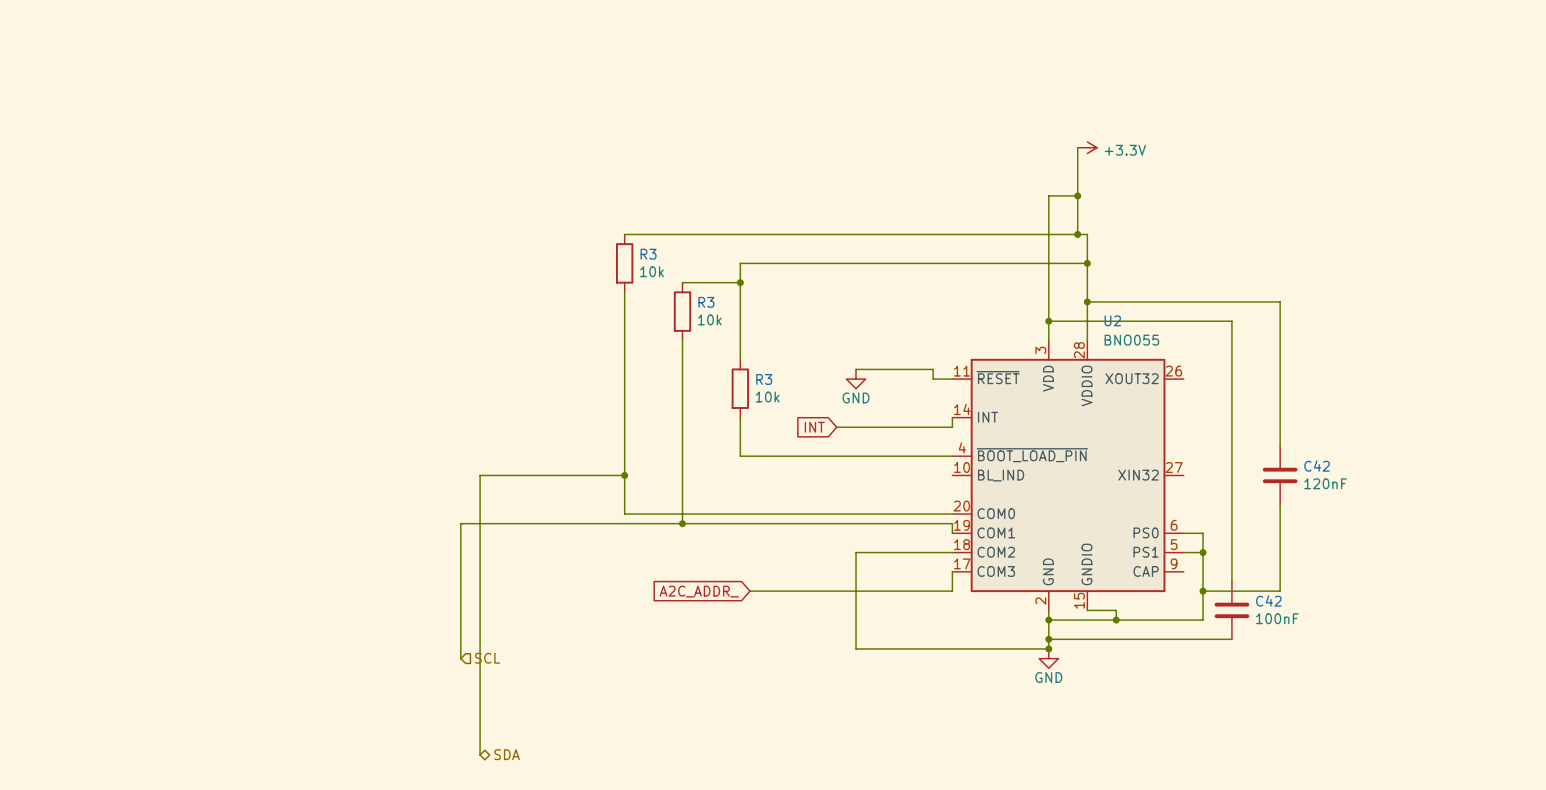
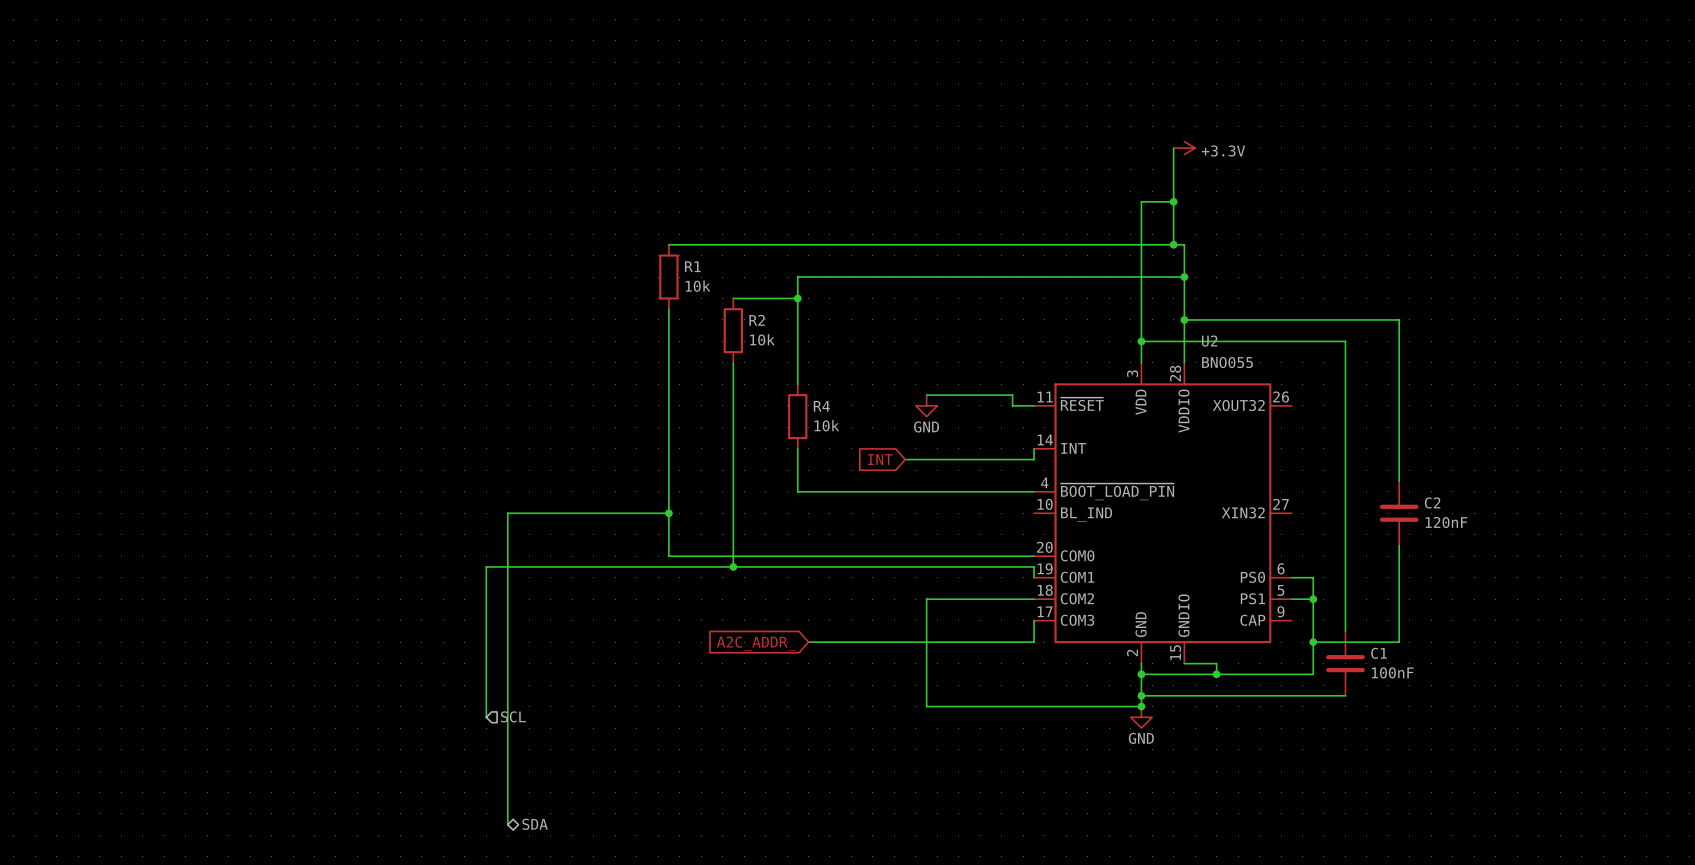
R3 name: R3 (648, 254) -> R1 (692, 266)
R3 name: R3 (706, 302) -> R2 (757, 320)
R3 name: R3 (764, 379) -> R4 (821, 406)
C42 name: C42 (1317, 466) -> C2 (1432, 502)
C42 name: C42 (1268, 600) -> C1 (1379, 653)

